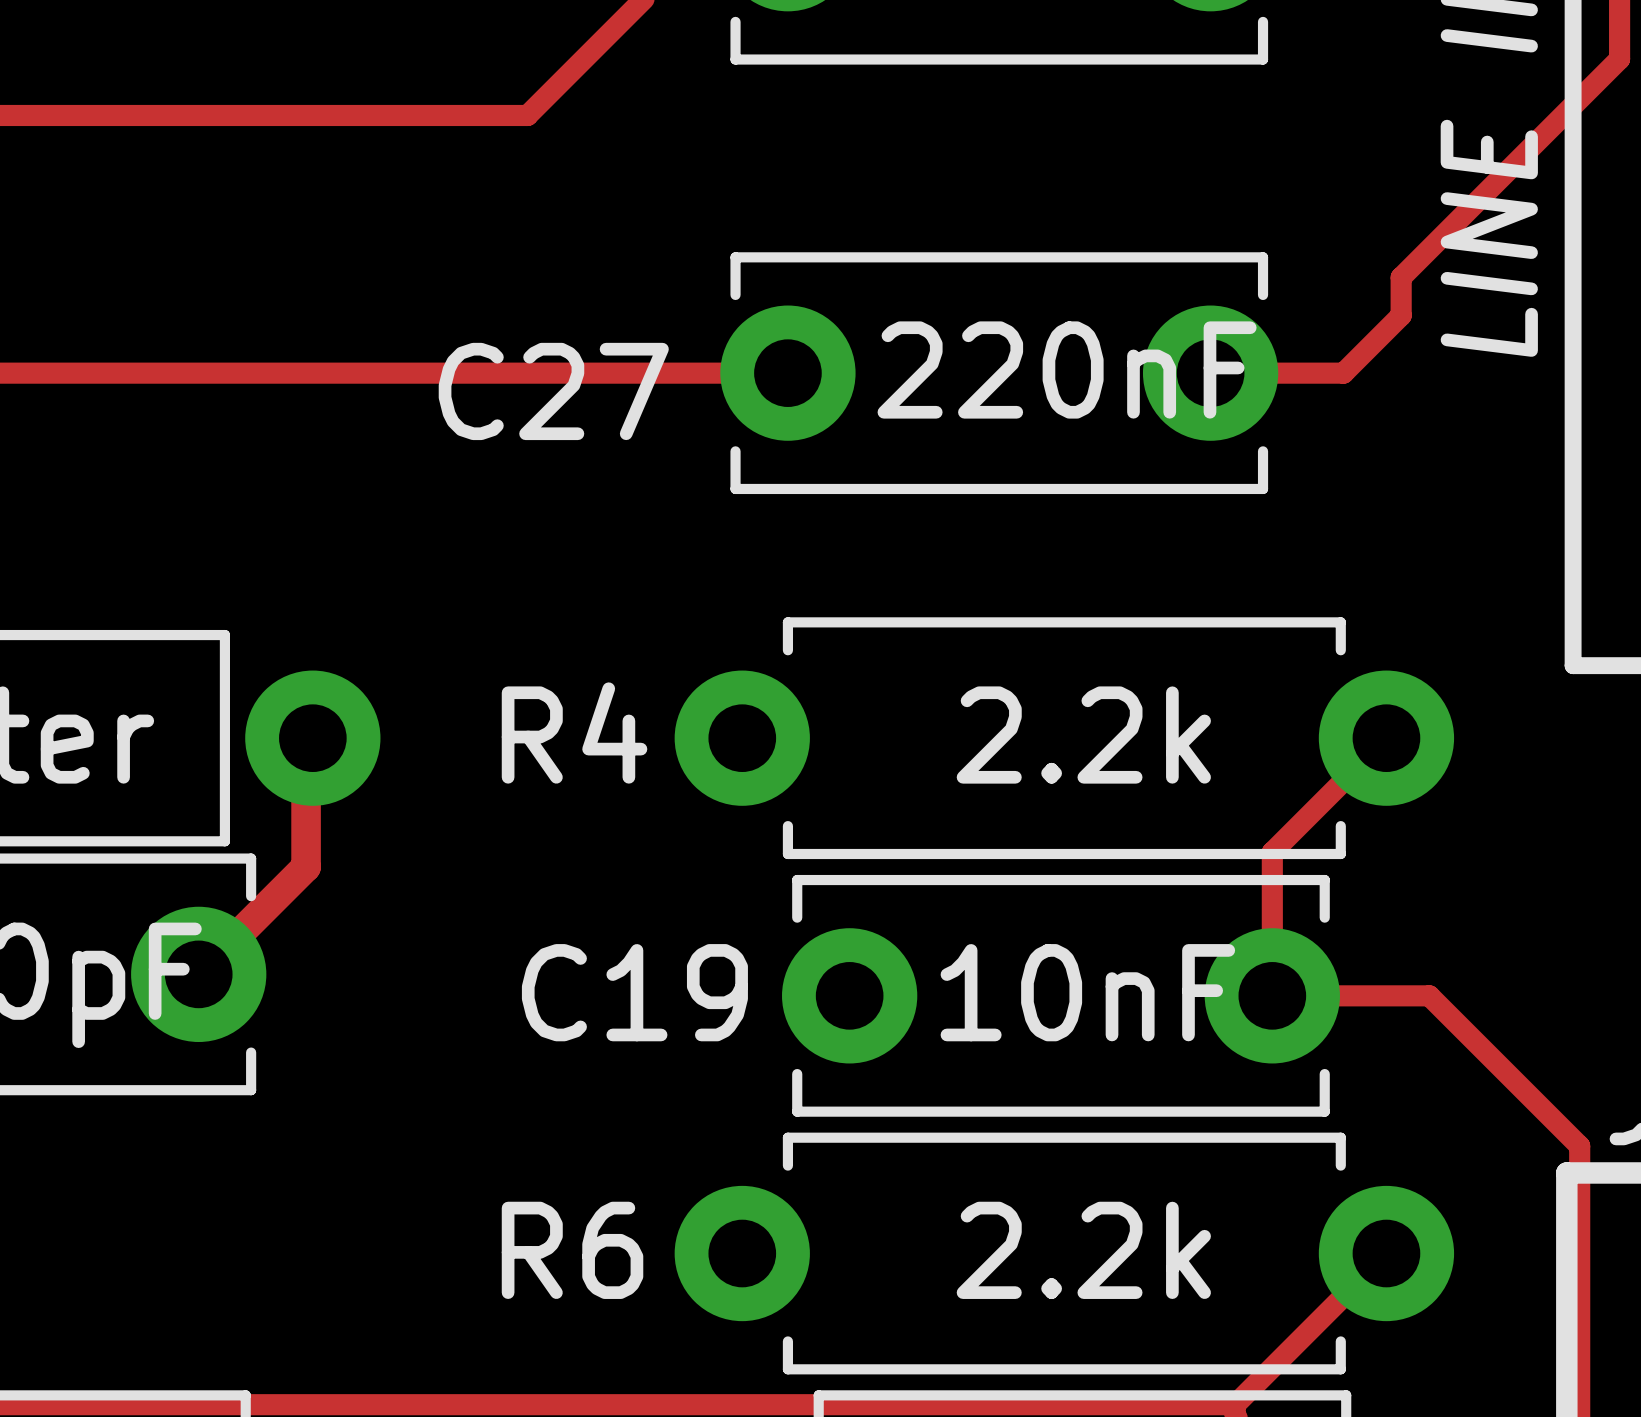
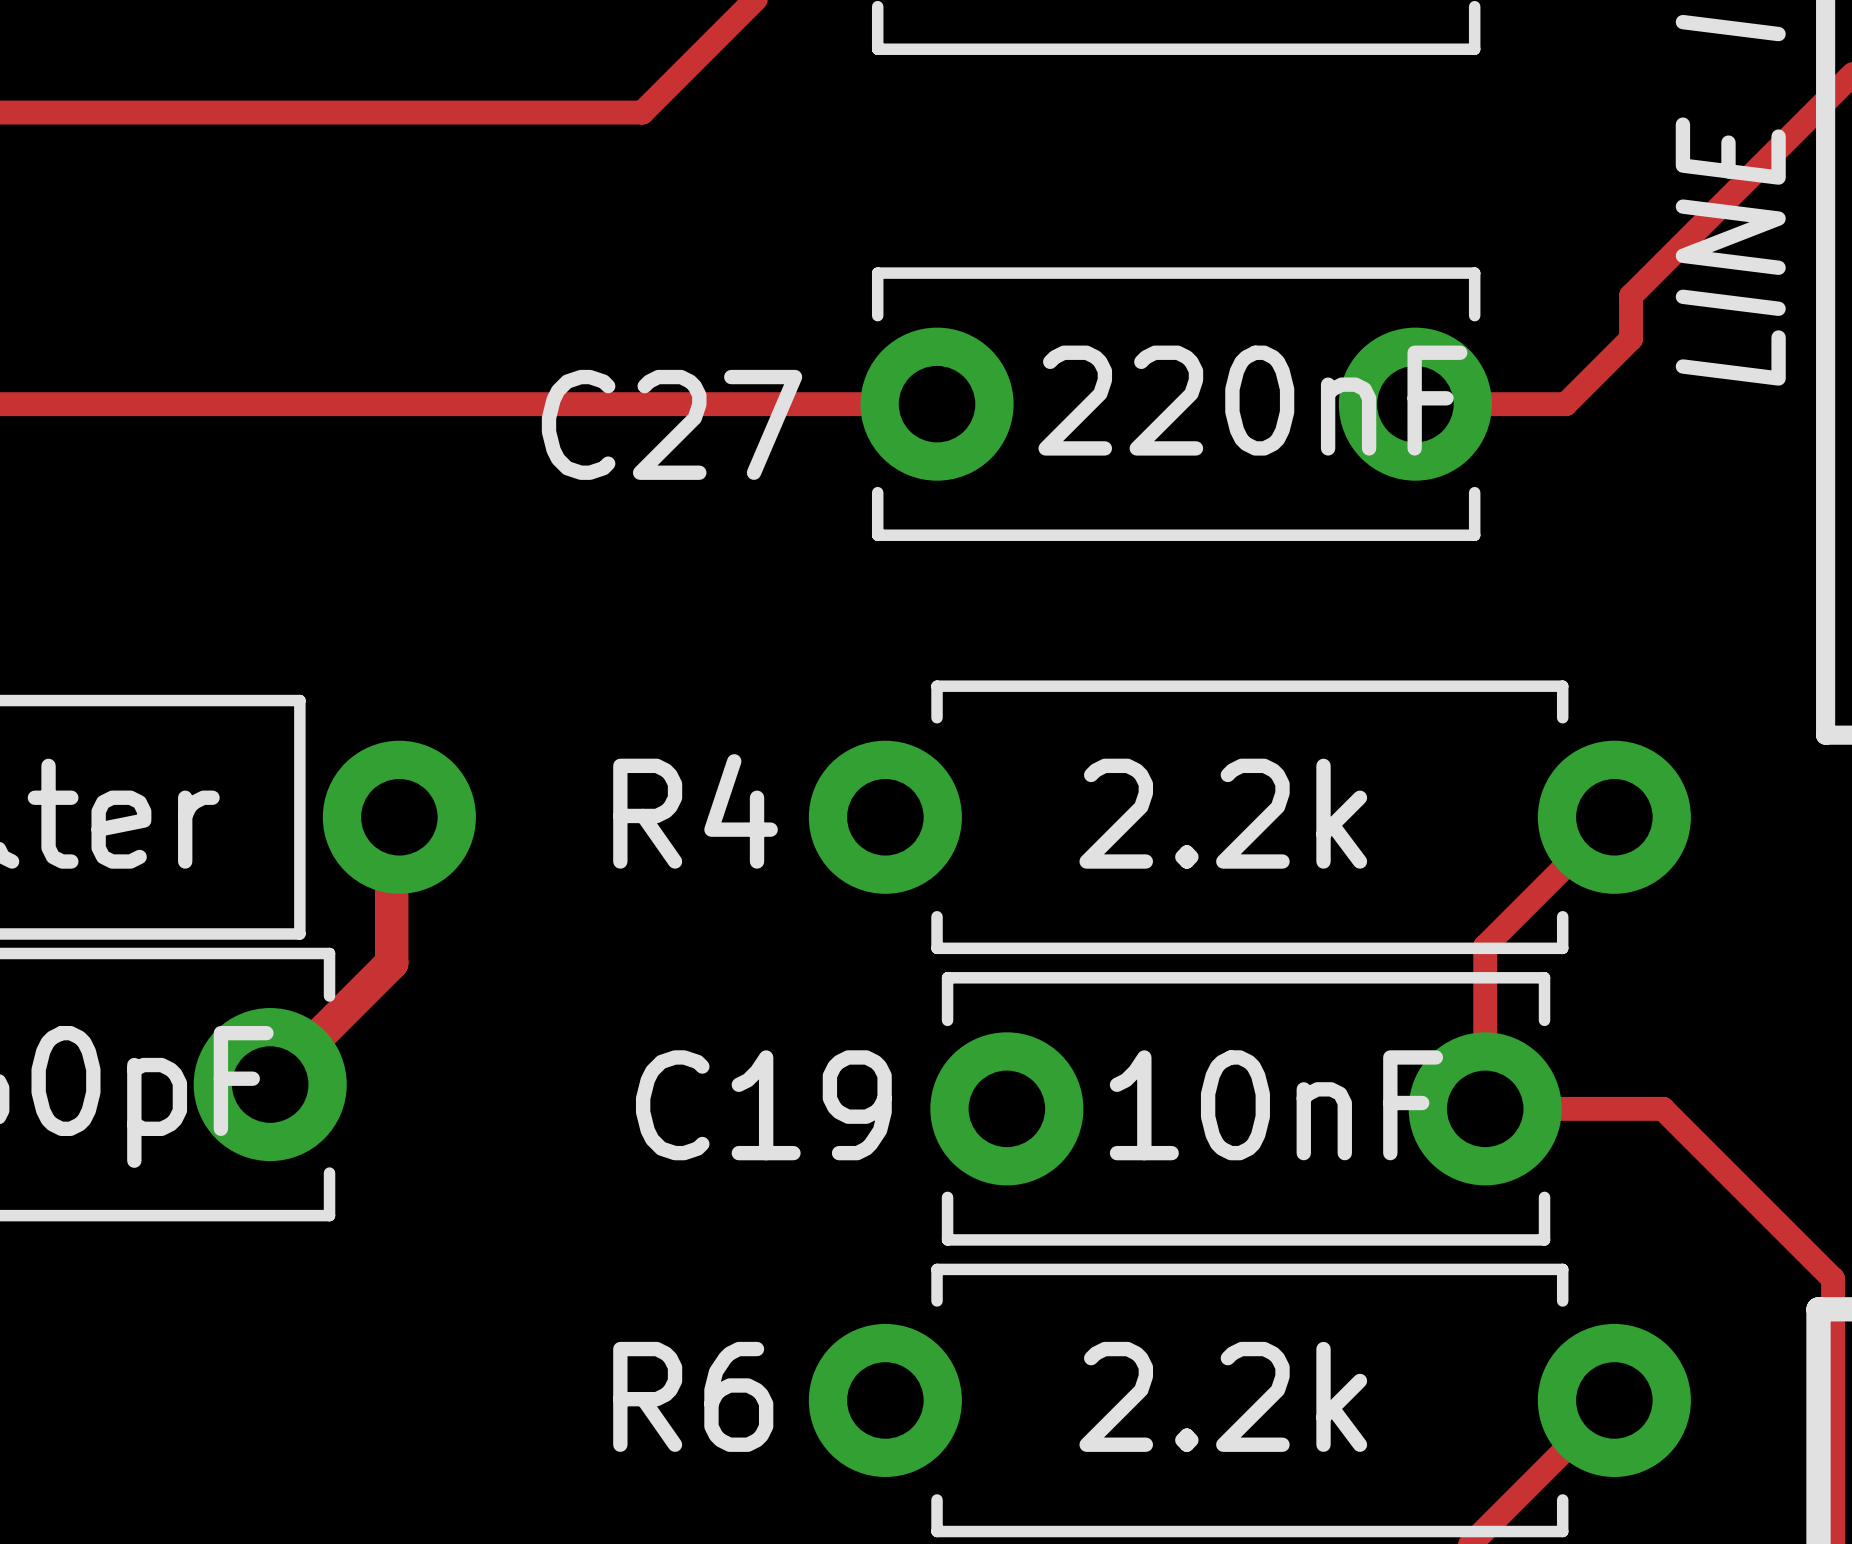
R4 value position: 2.2k (1083, 735) -> 2.2k (1223, 813)
R6 value position: 2.2k (1083, 1250) -> 2.2k (1223, 1396)

